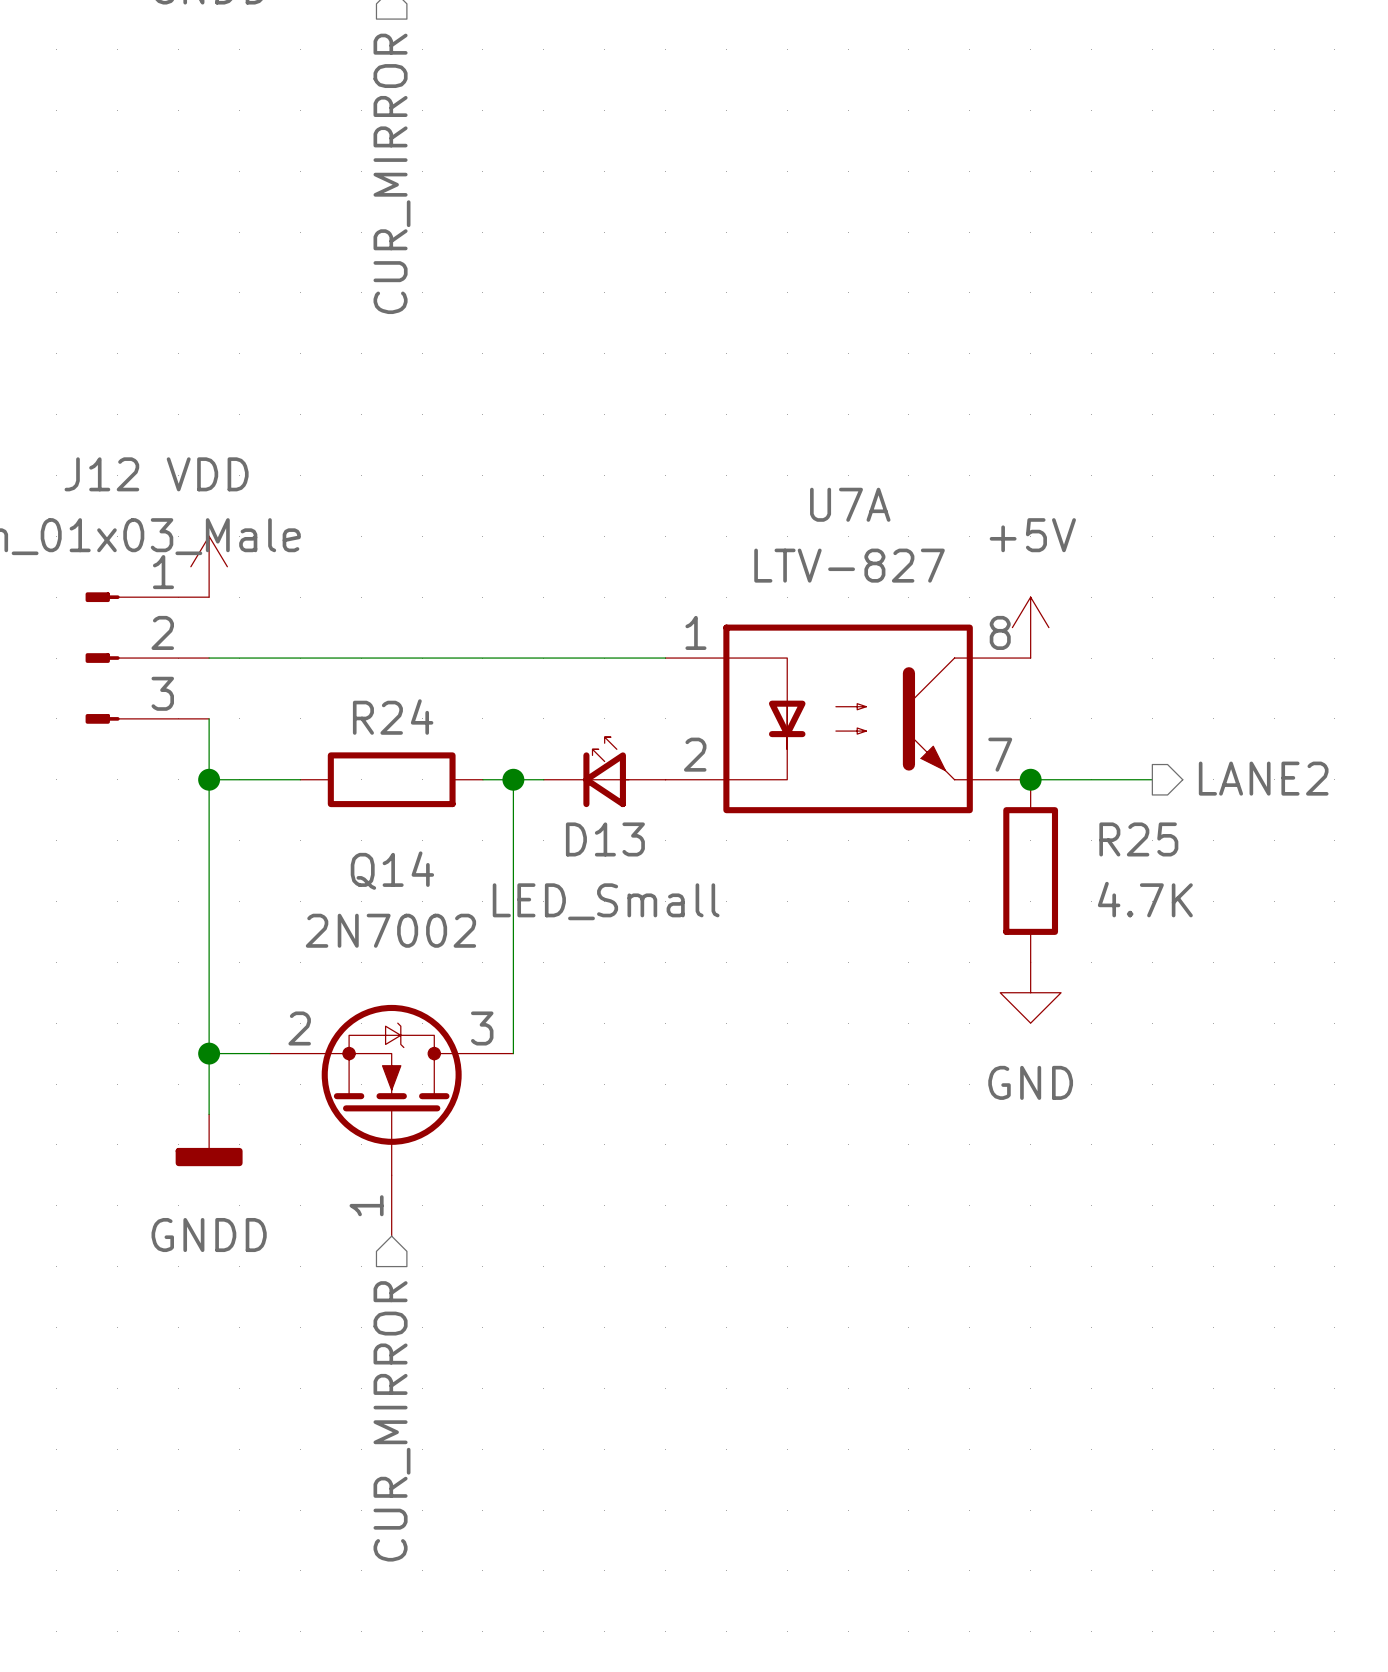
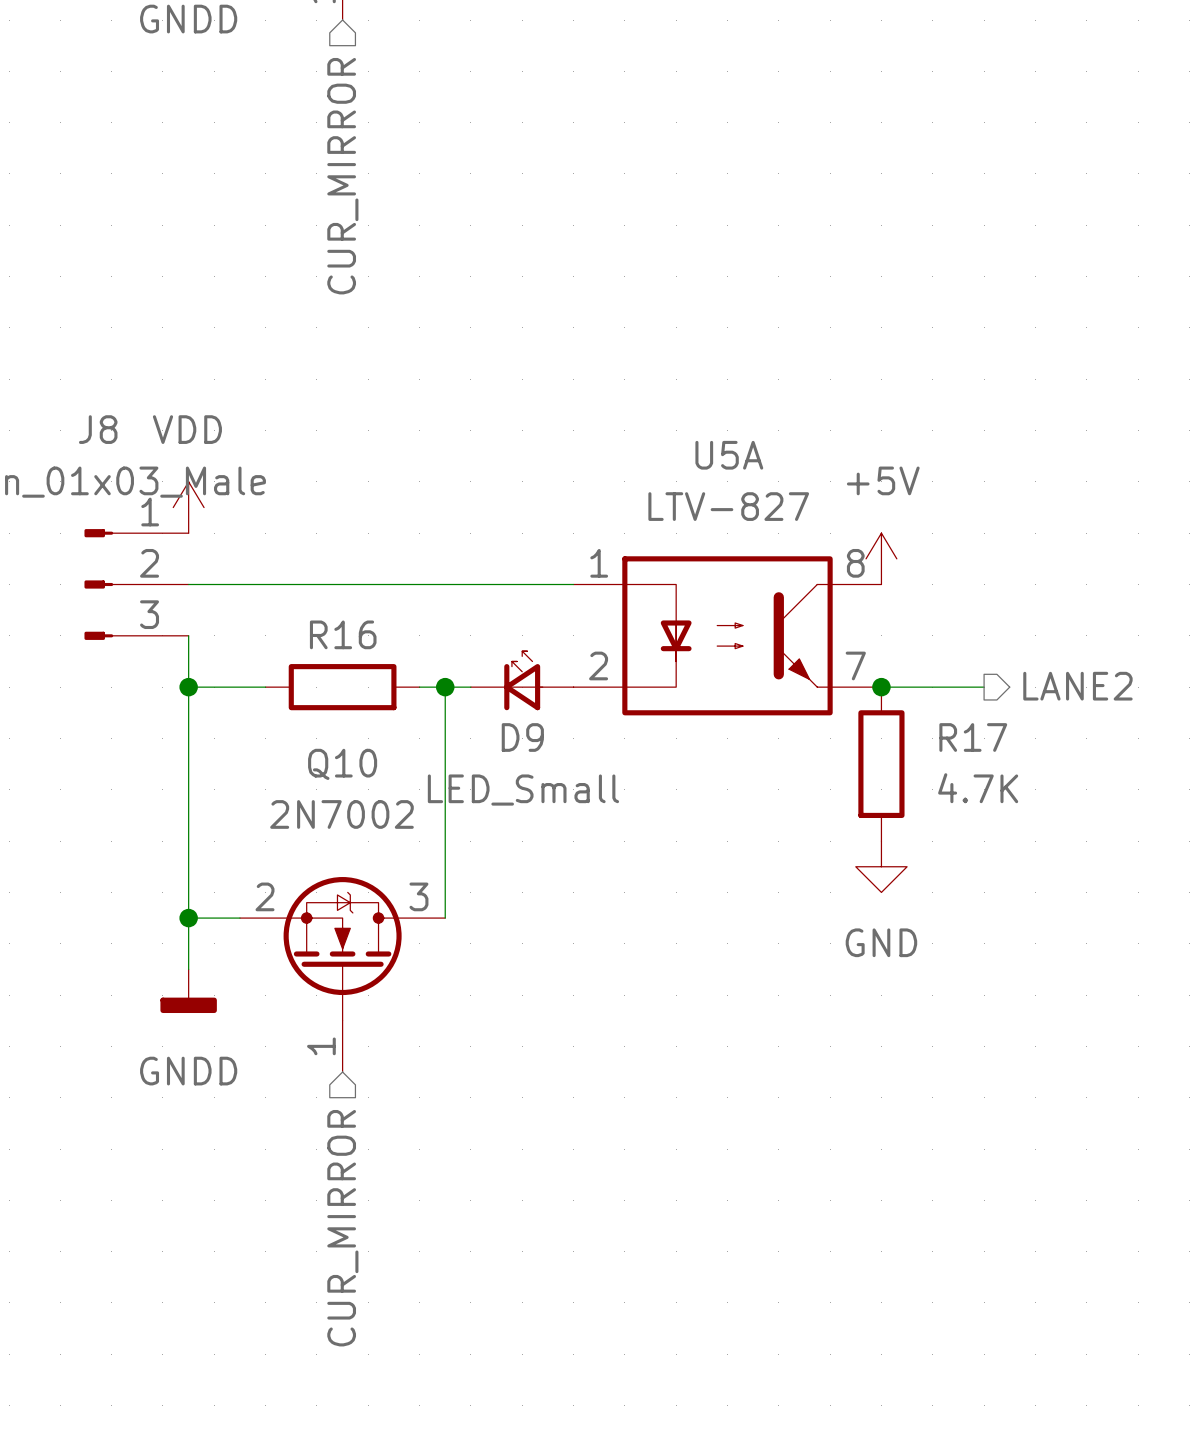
J12 name: J12 (101, 474) -> J8 (98, 429)
U7A name: U7A (850, 504) -> U5A (729, 455)
R24 name: R24 (393, 717) -> R16 (343, 634)
D13 name: D13 (605, 839) -> D9 (522, 737)
R25 name: R25 (1138, 839) -> R17 (973, 737)
Q14 name: Q14 (392, 870) -> Q10 (342, 764)

